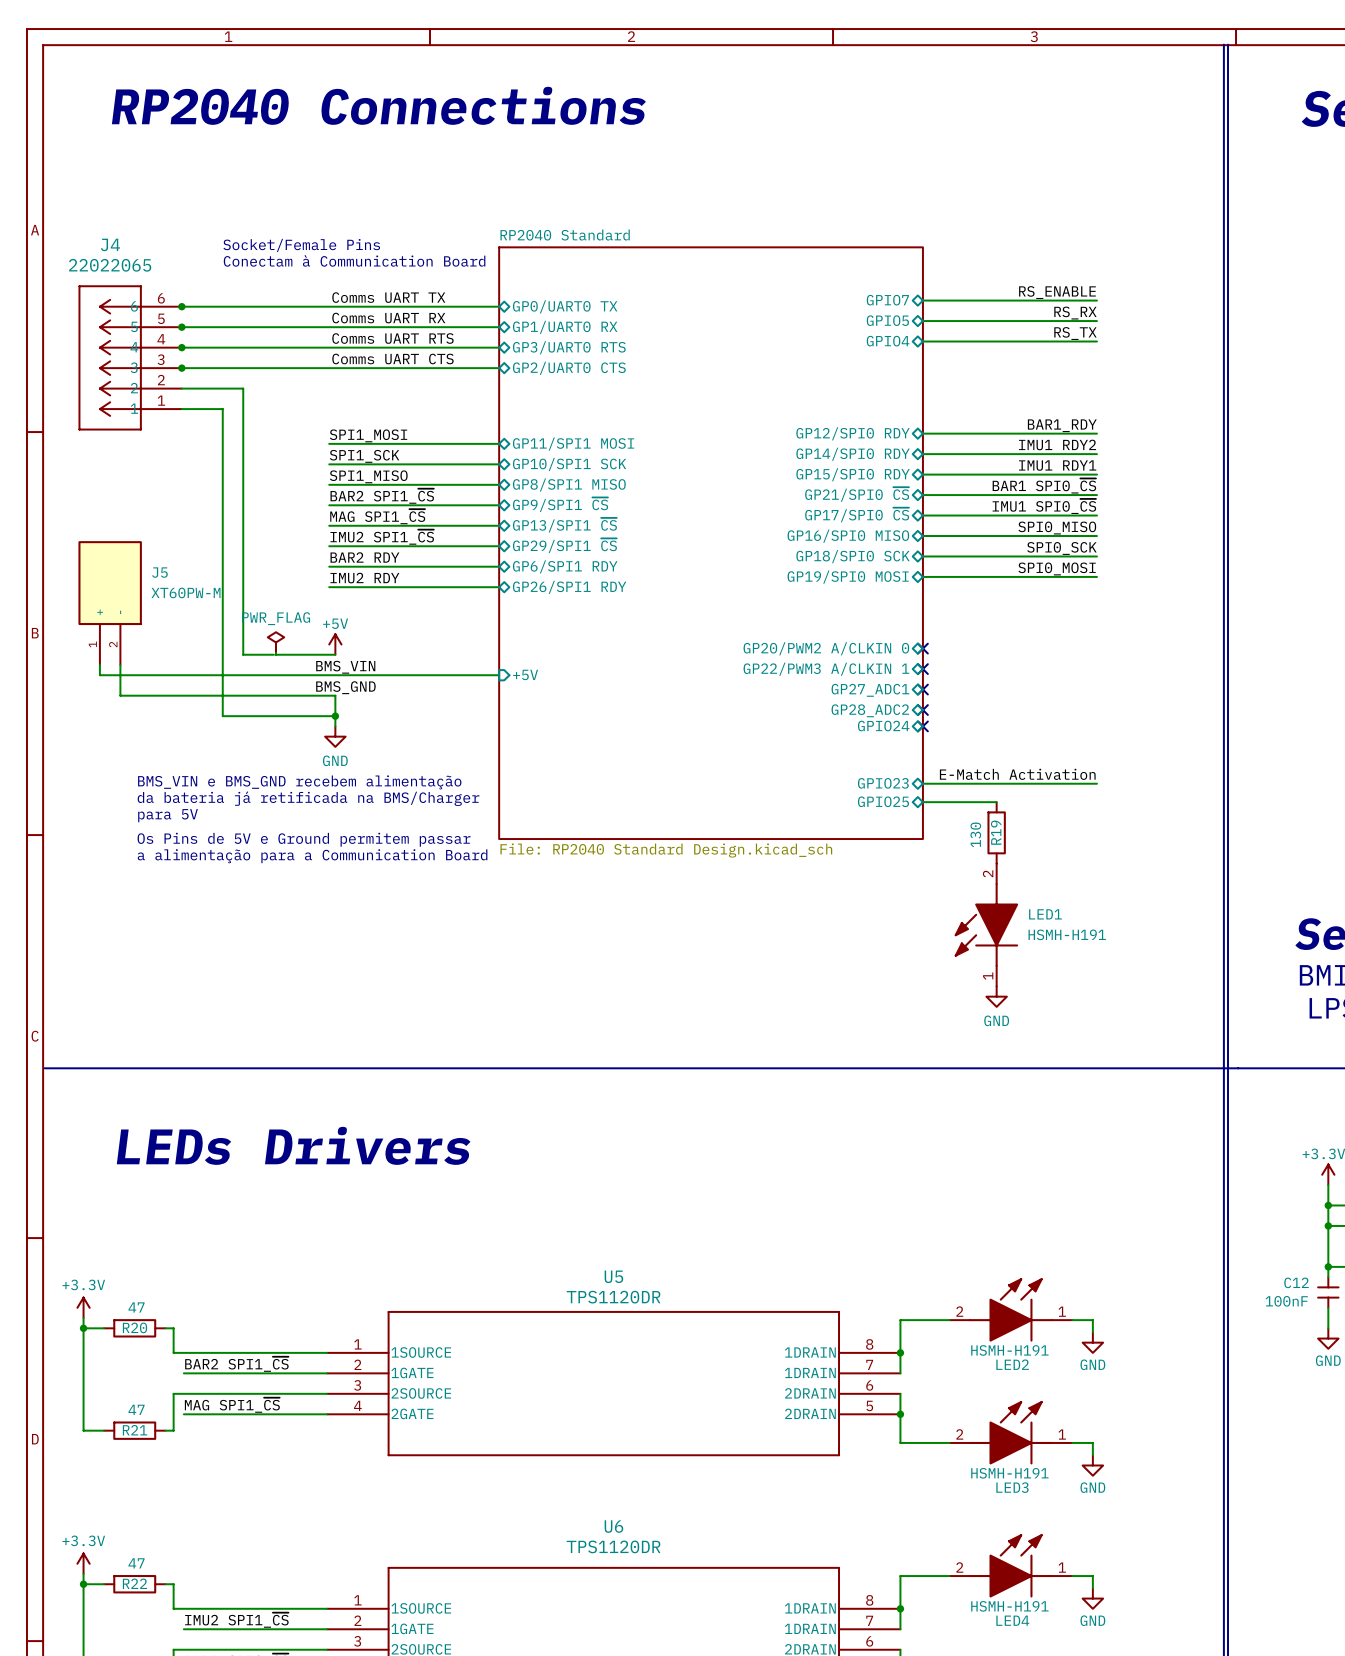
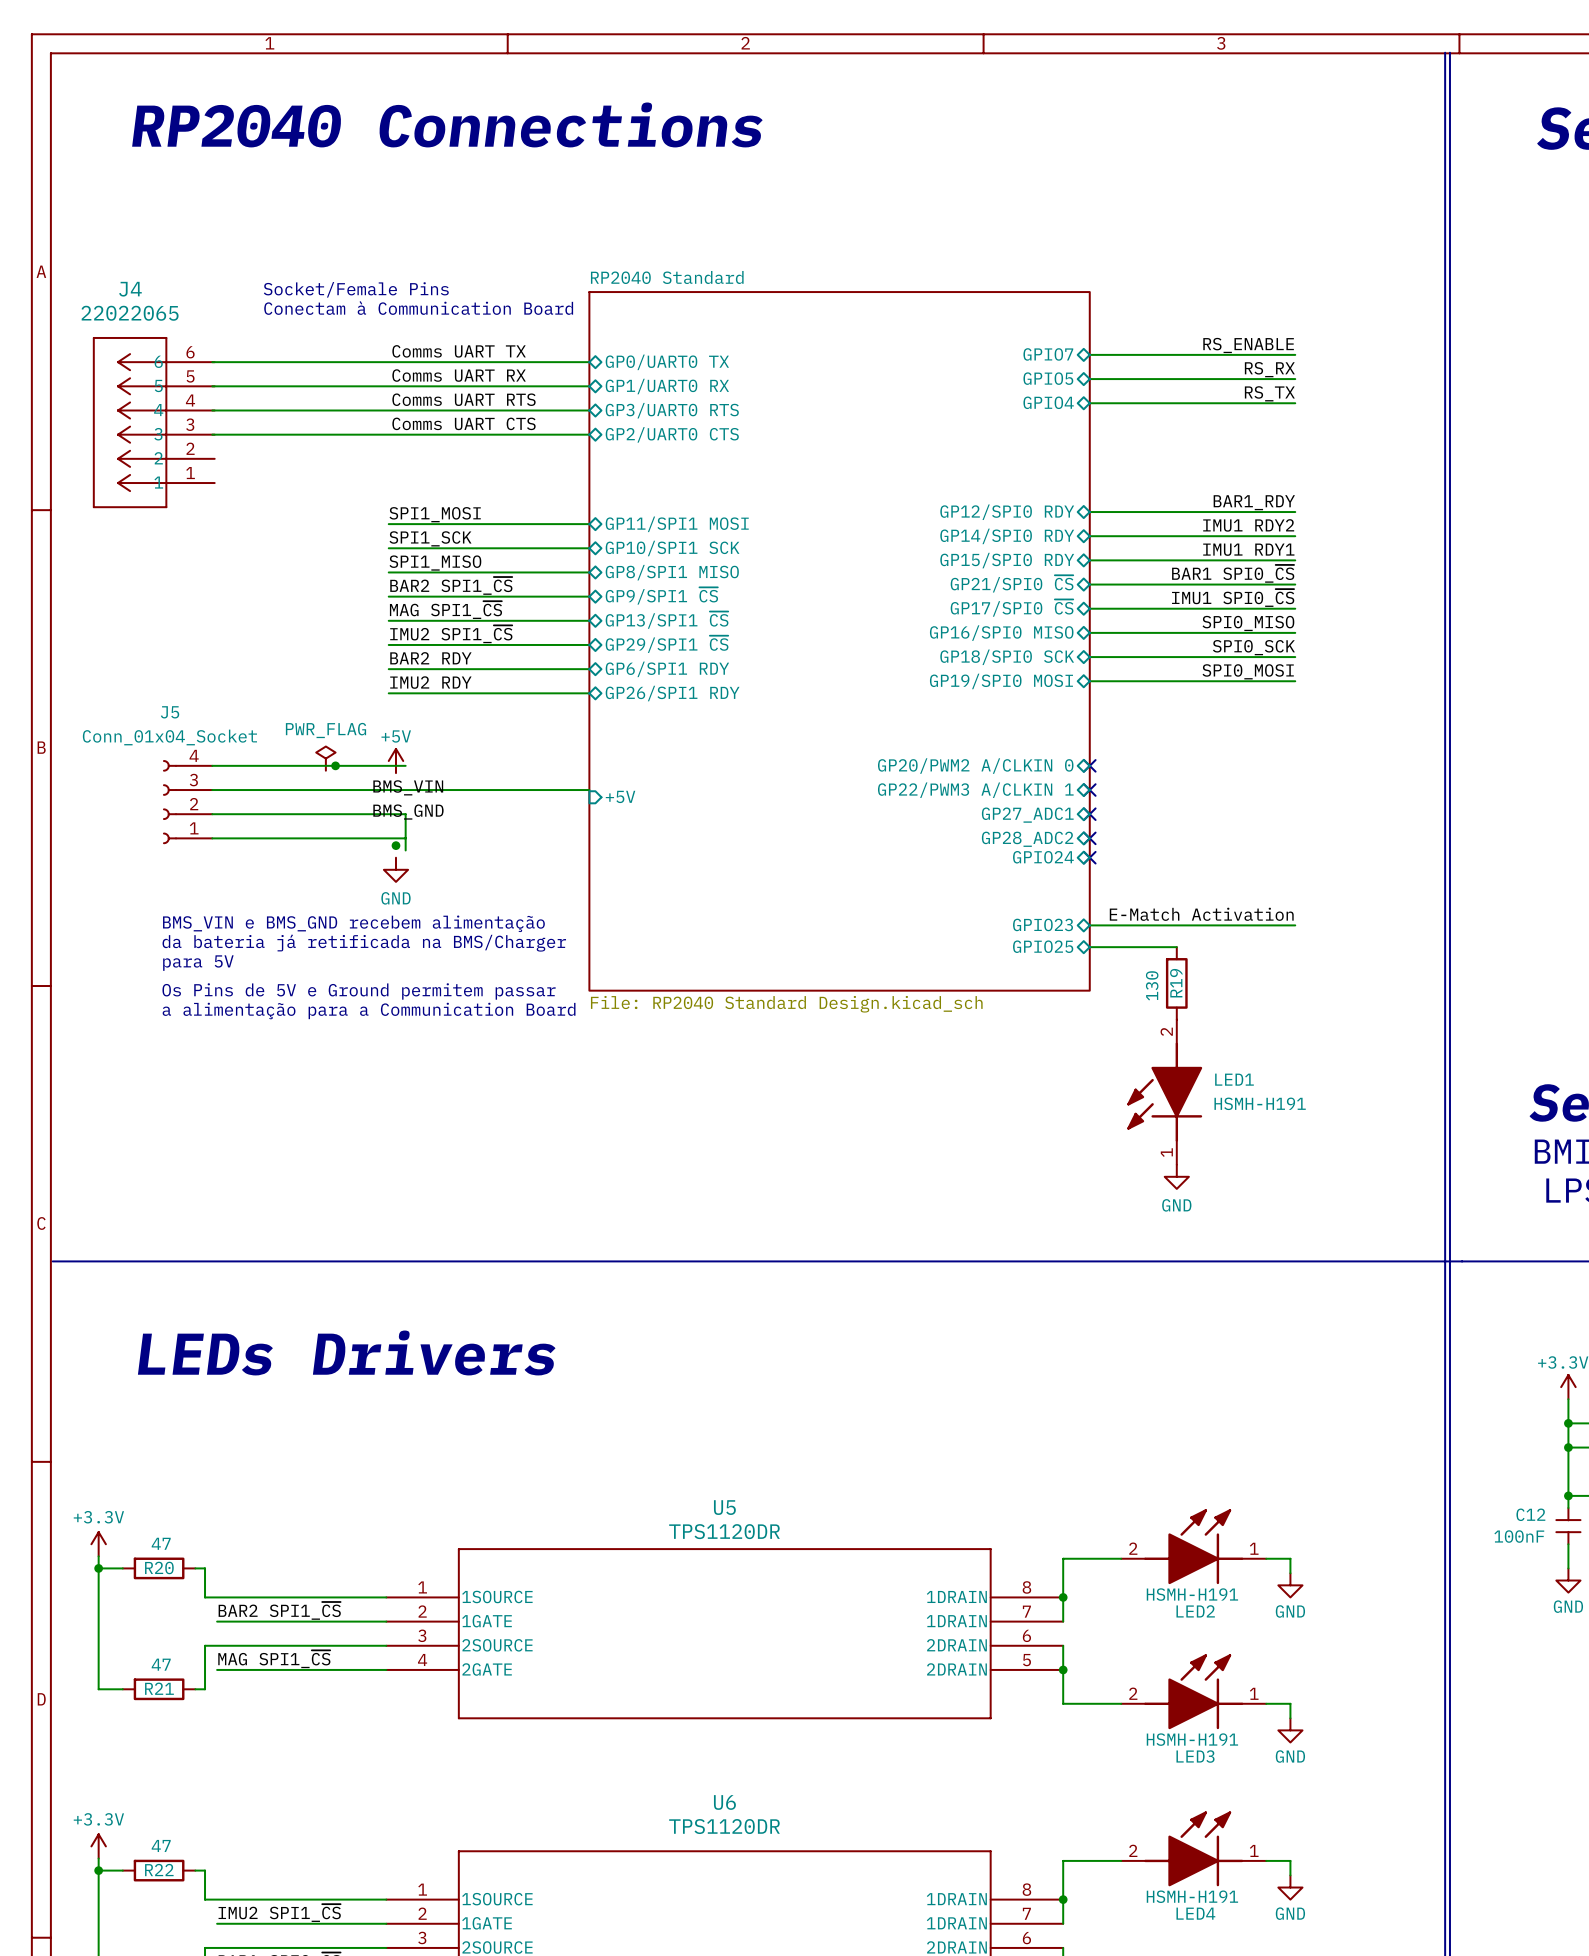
junction: (181, 306) -> none
junction: (181, 327) -> none
junction: (181, 347) -> none
junction: (181, 368) -> none
wire: (181, 388) (243, 388) (243, 654) (273, 654) -> none
wire: (181, 409) (222, 409) (222, 716) (335, 716) -> none
J5 symbol: [78, 541, 142, 665] -> [163, 760, 213, 844]
J5 name position: J5 (159, 572) -> J5 (170, 712)
J5 value: XT60PW-M (186, 592) -> Conn_01x04_Socket (169, 737)
wire: none -> (212, 765) (405, 765)
junction: none -> (335, 765)
wire: (276, 652) (276, 654) (335, 654) -> none
wire: (99, 664) (99, 675) (499, 675) -> none
wire: (120, 664) (120, 695) (335, 695) (335, 726) -> none
wire: none -> (212, 790) (589, 790)
wire: none -> (212, 814) (405, 814) (405, 850)
wire: none -> (212, 838) (405, 838)

